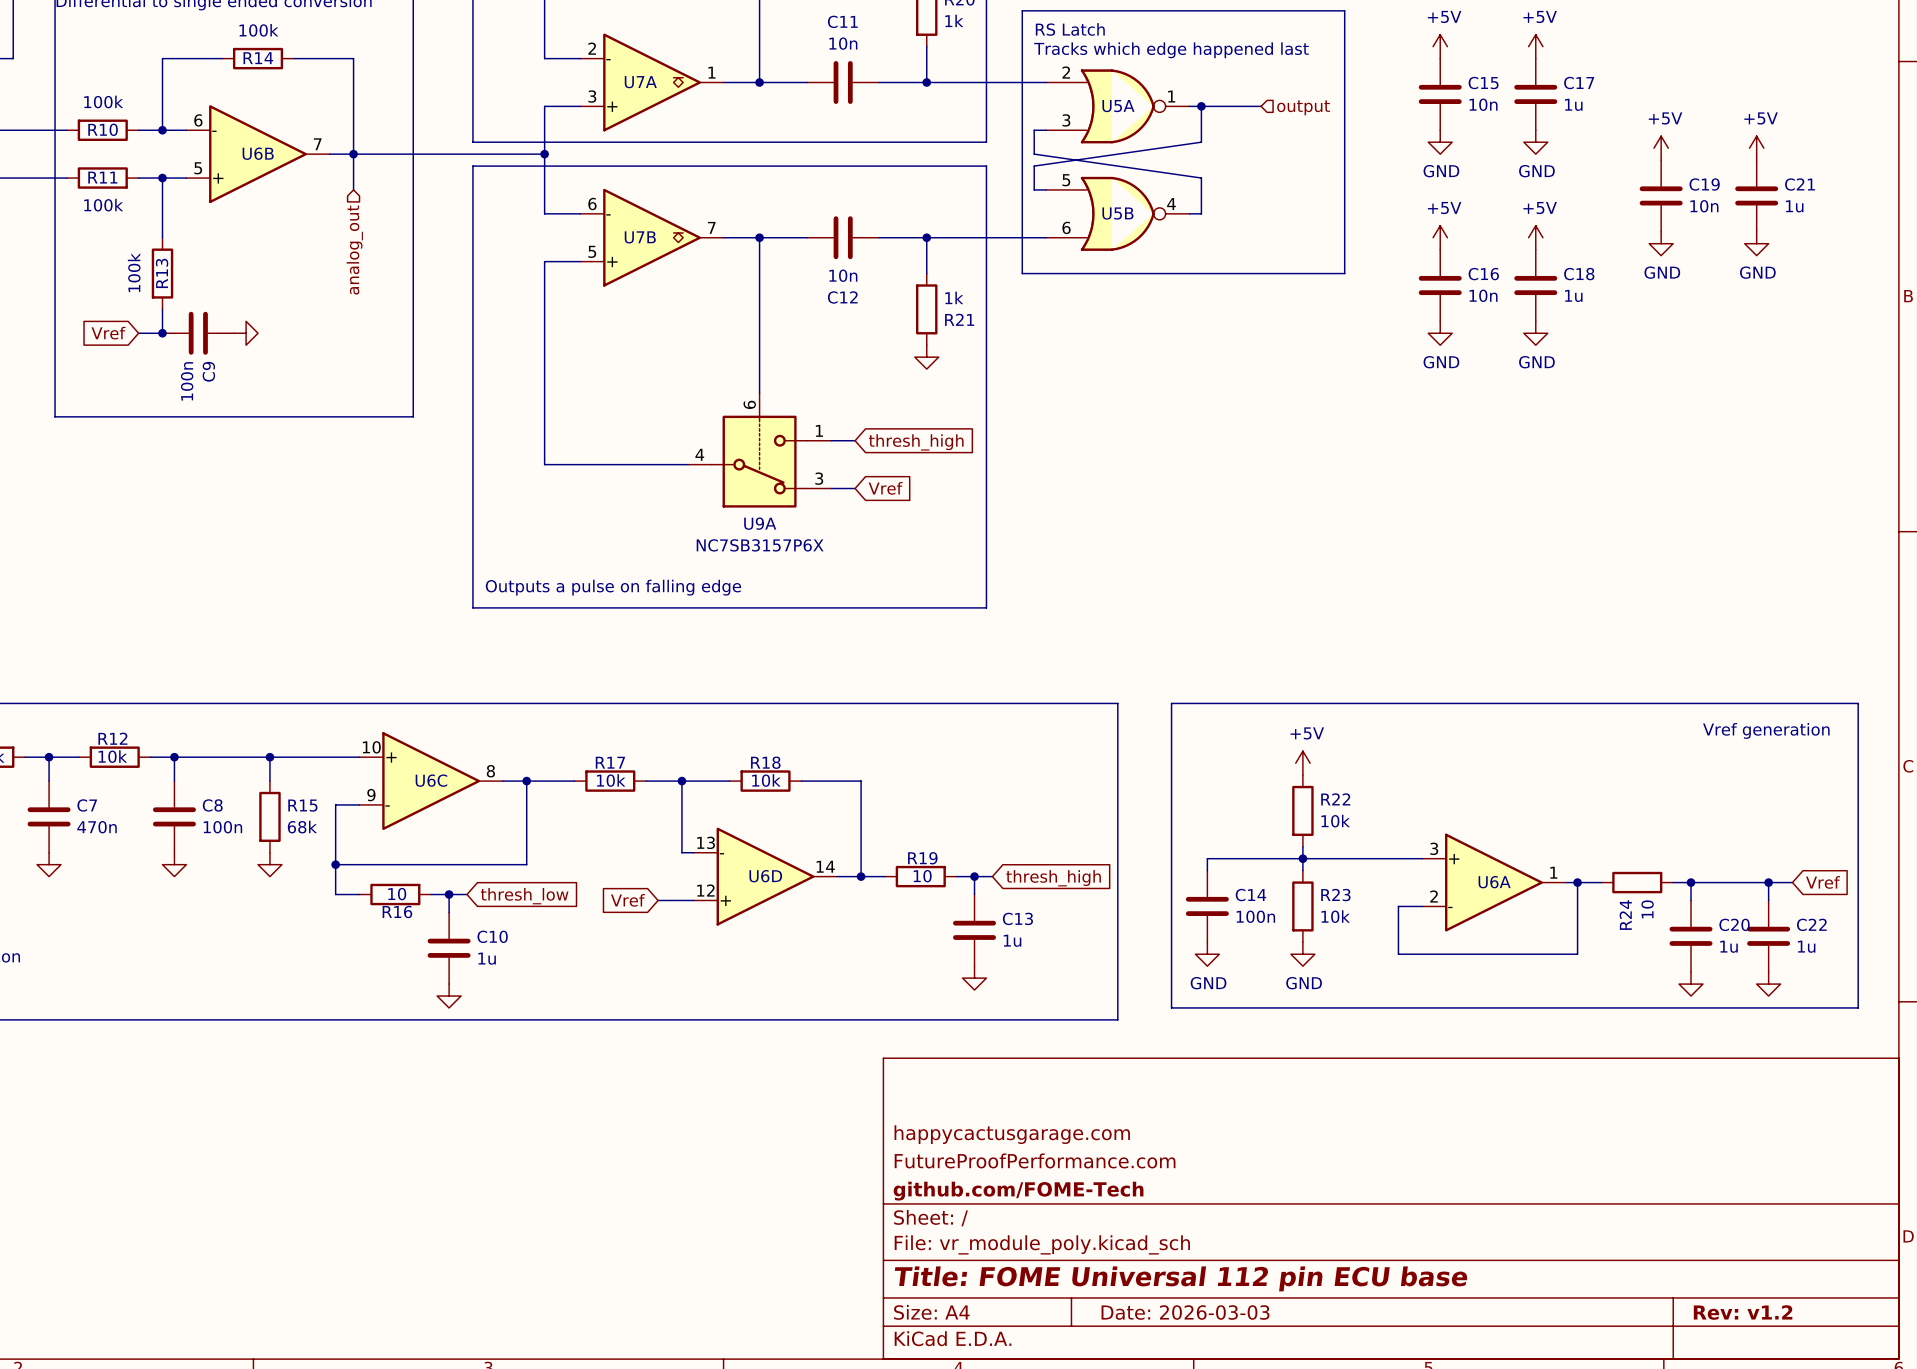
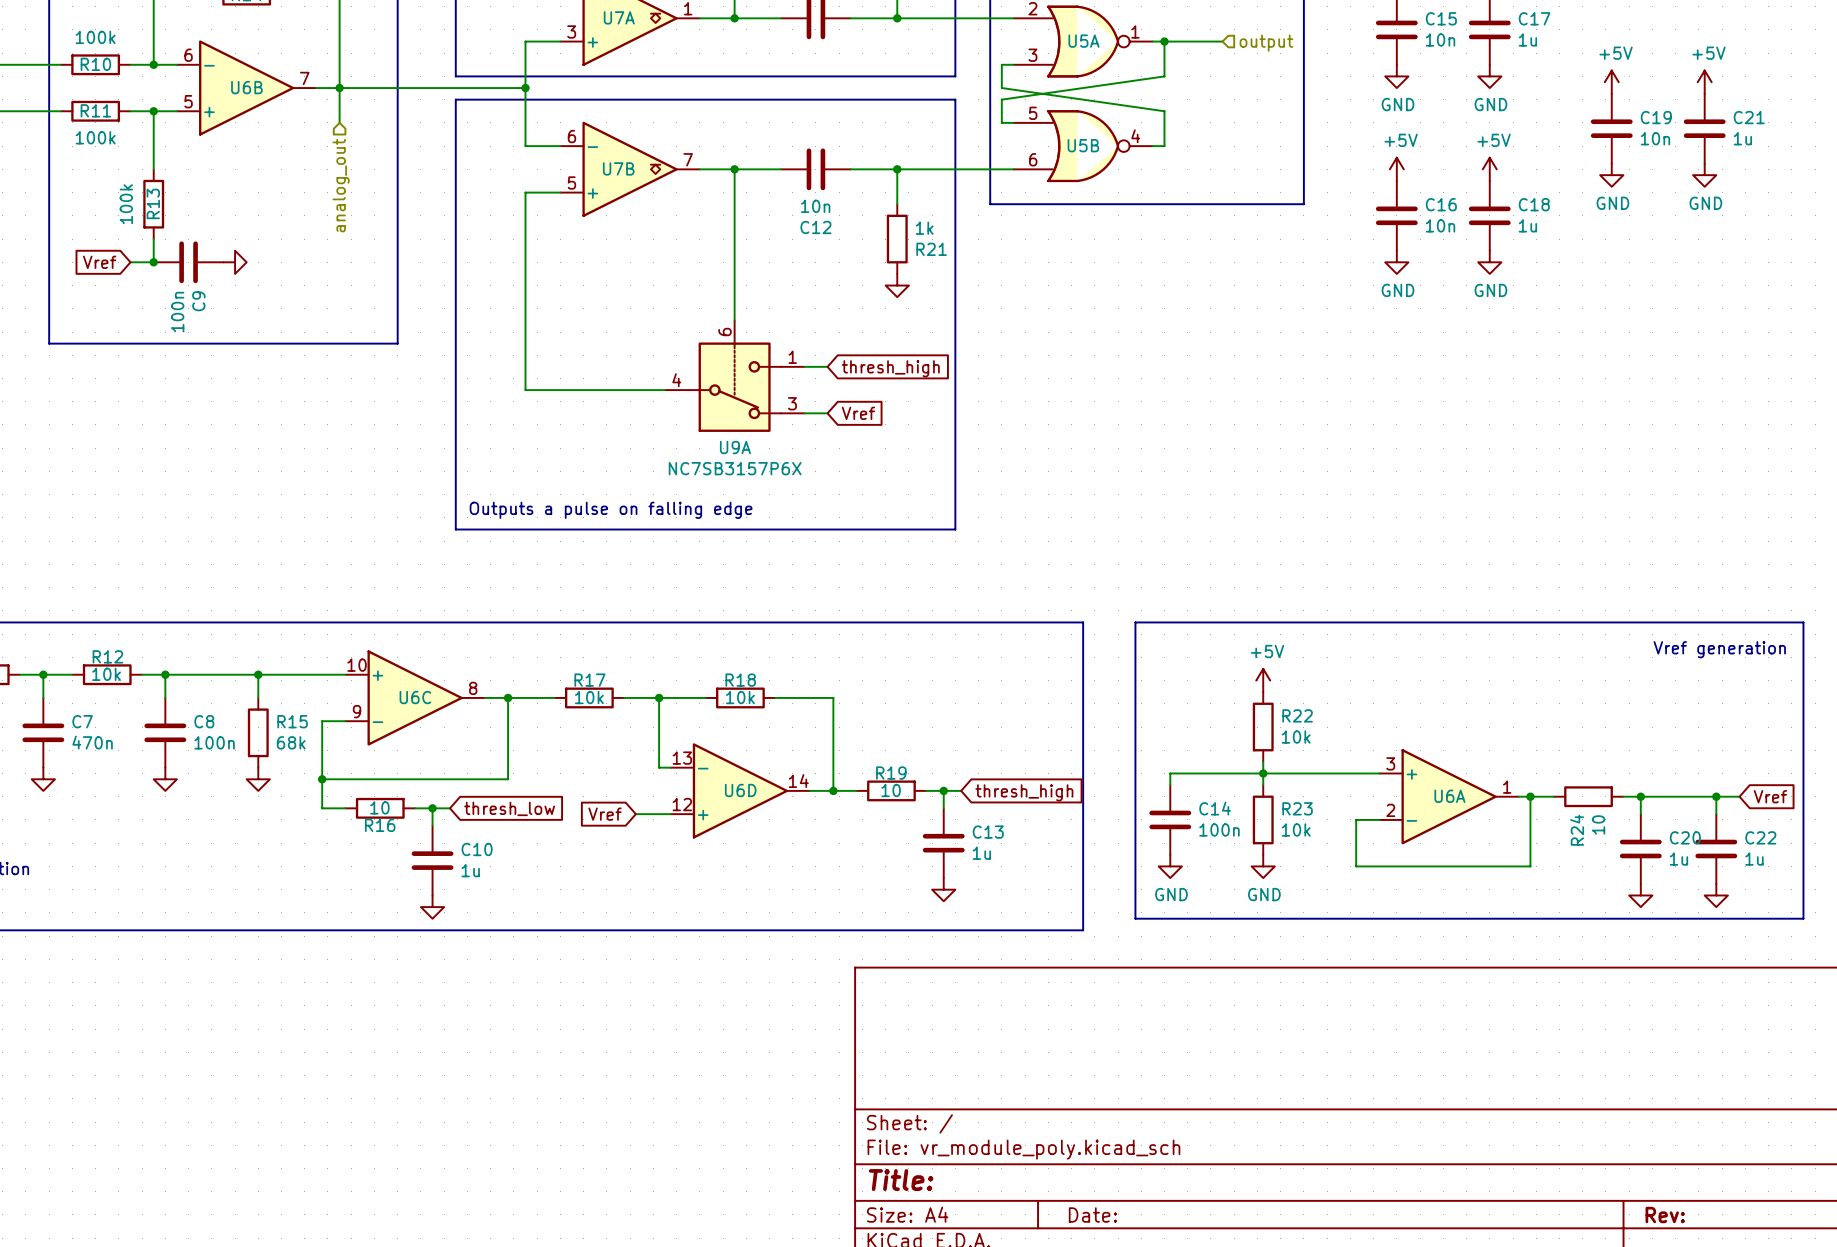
title block: happycactusgarage.com (1012, 1134) -> none
title block: FutureProofPerformance.com (1035, 1160) -> none
title block: github.com/FOME-Tech (1018, 1191) -> none
title block: Title: FOME Universal 112 pin ECU base (1181, 1278) -> Title: (901, 1180)
title block: Date: 2026-03-03 (1185, 1312) -> Date: (1092, 1215)
title block: Rev: v1.2 (1743, 1312) -> Rev: (1665, 1215)

